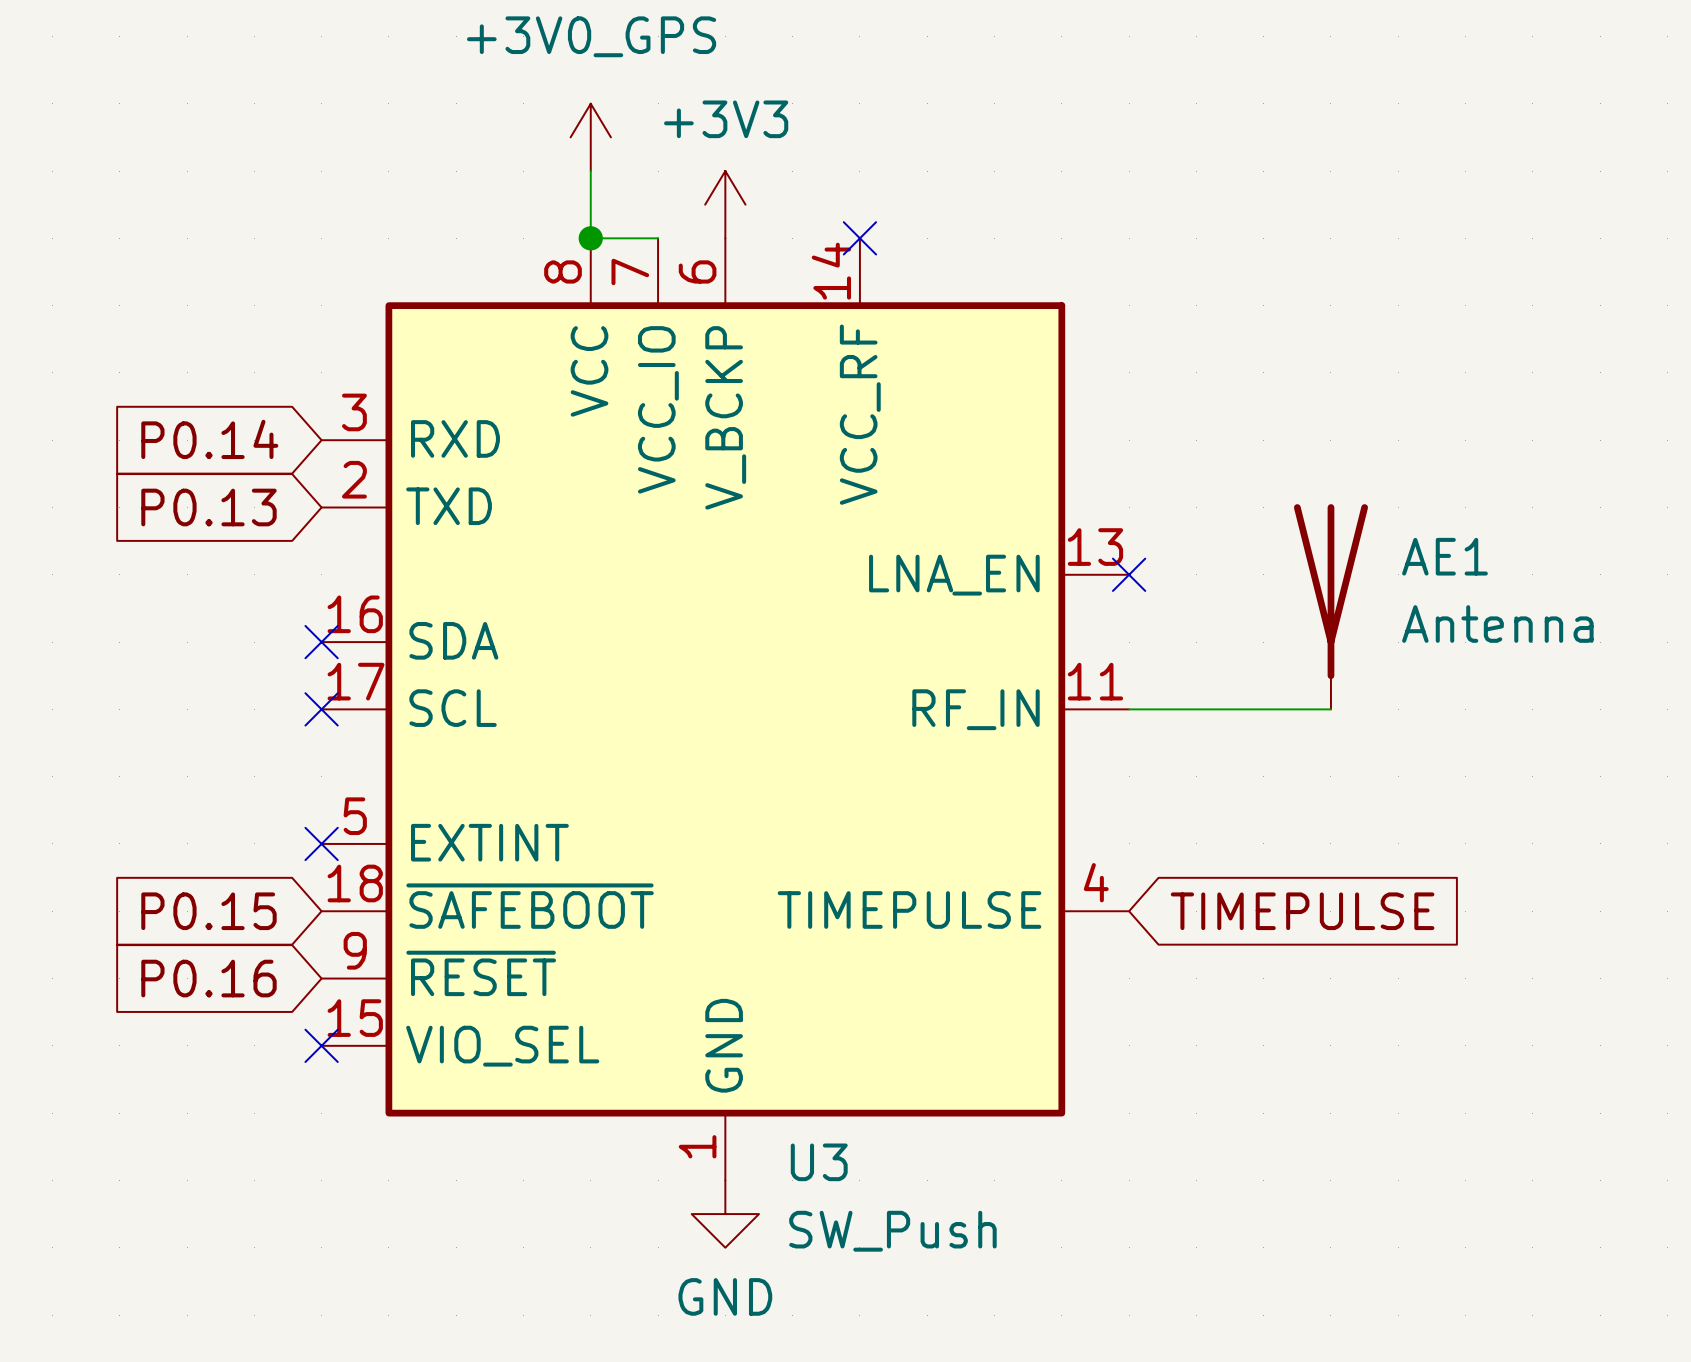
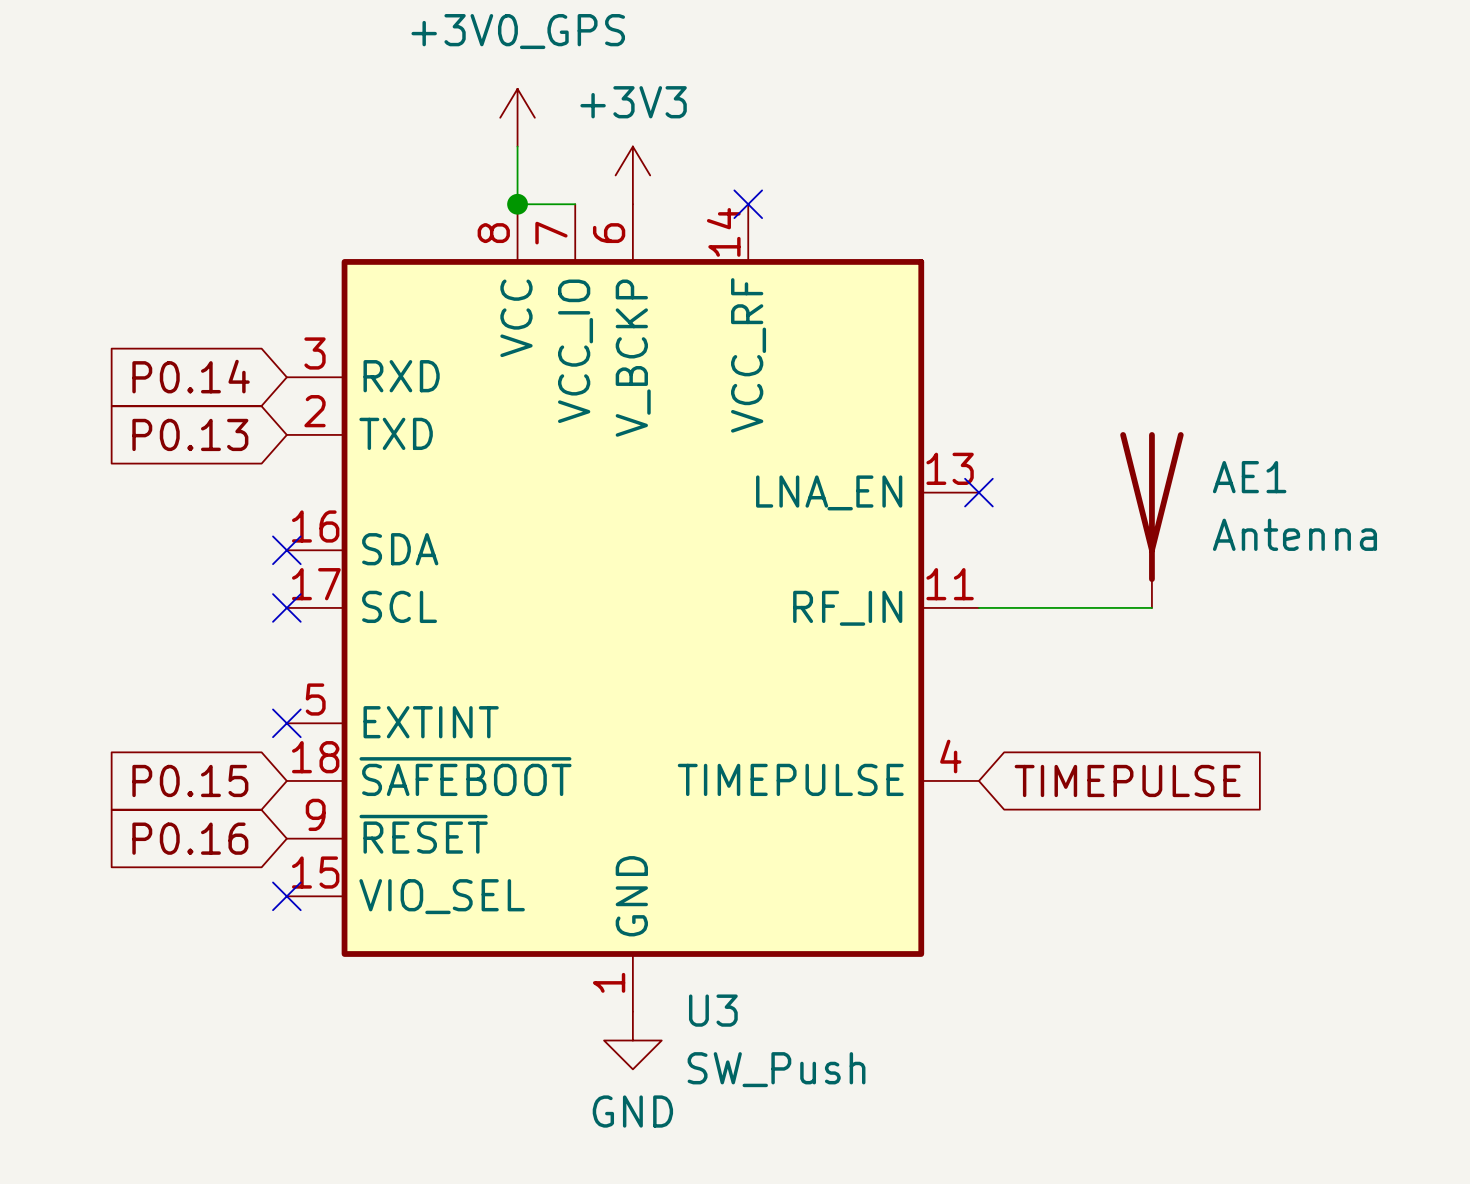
U3 name position: U3 (819, 1162) -> U3 (713, 1010)
U3 value position: SW_Push (892, 1231) -> SW_Push (776, 1069)

